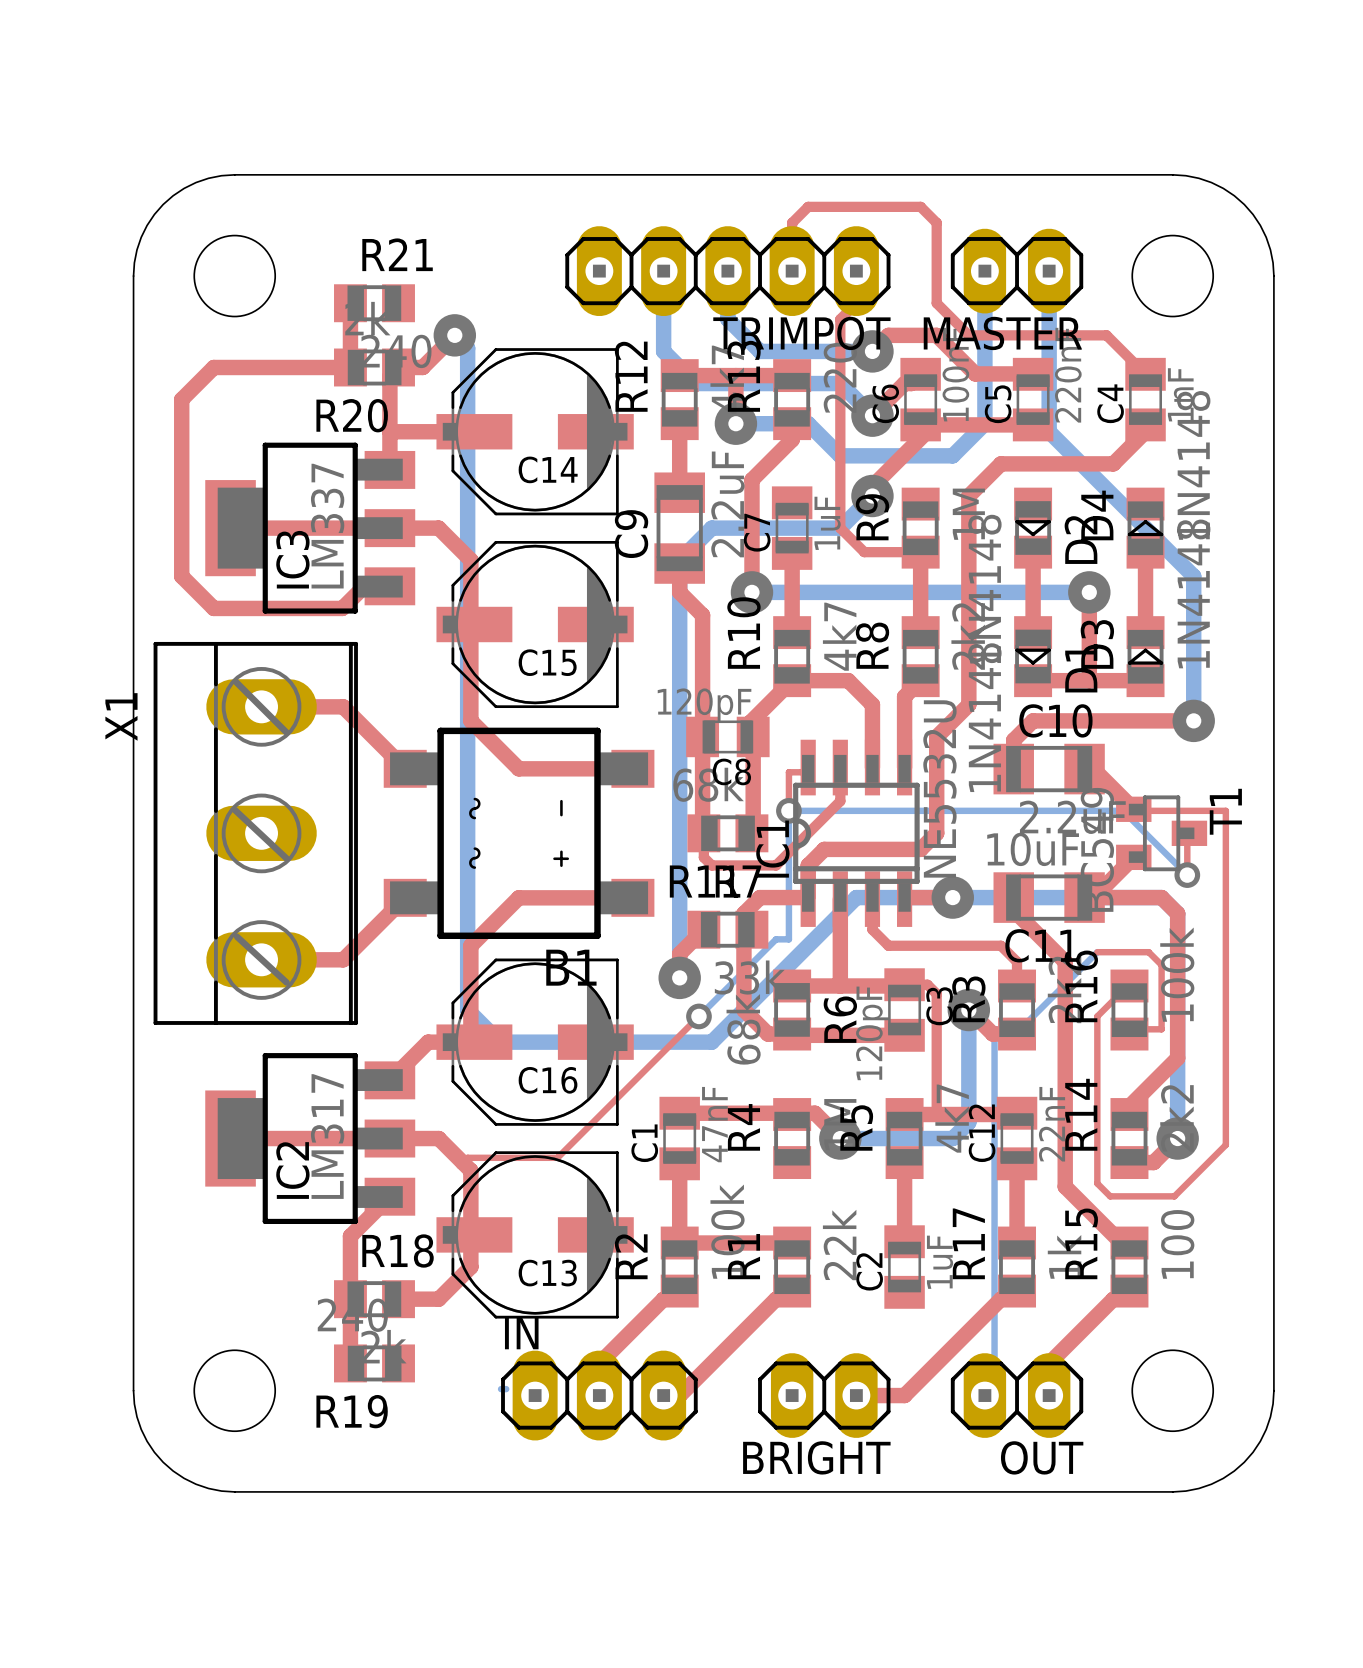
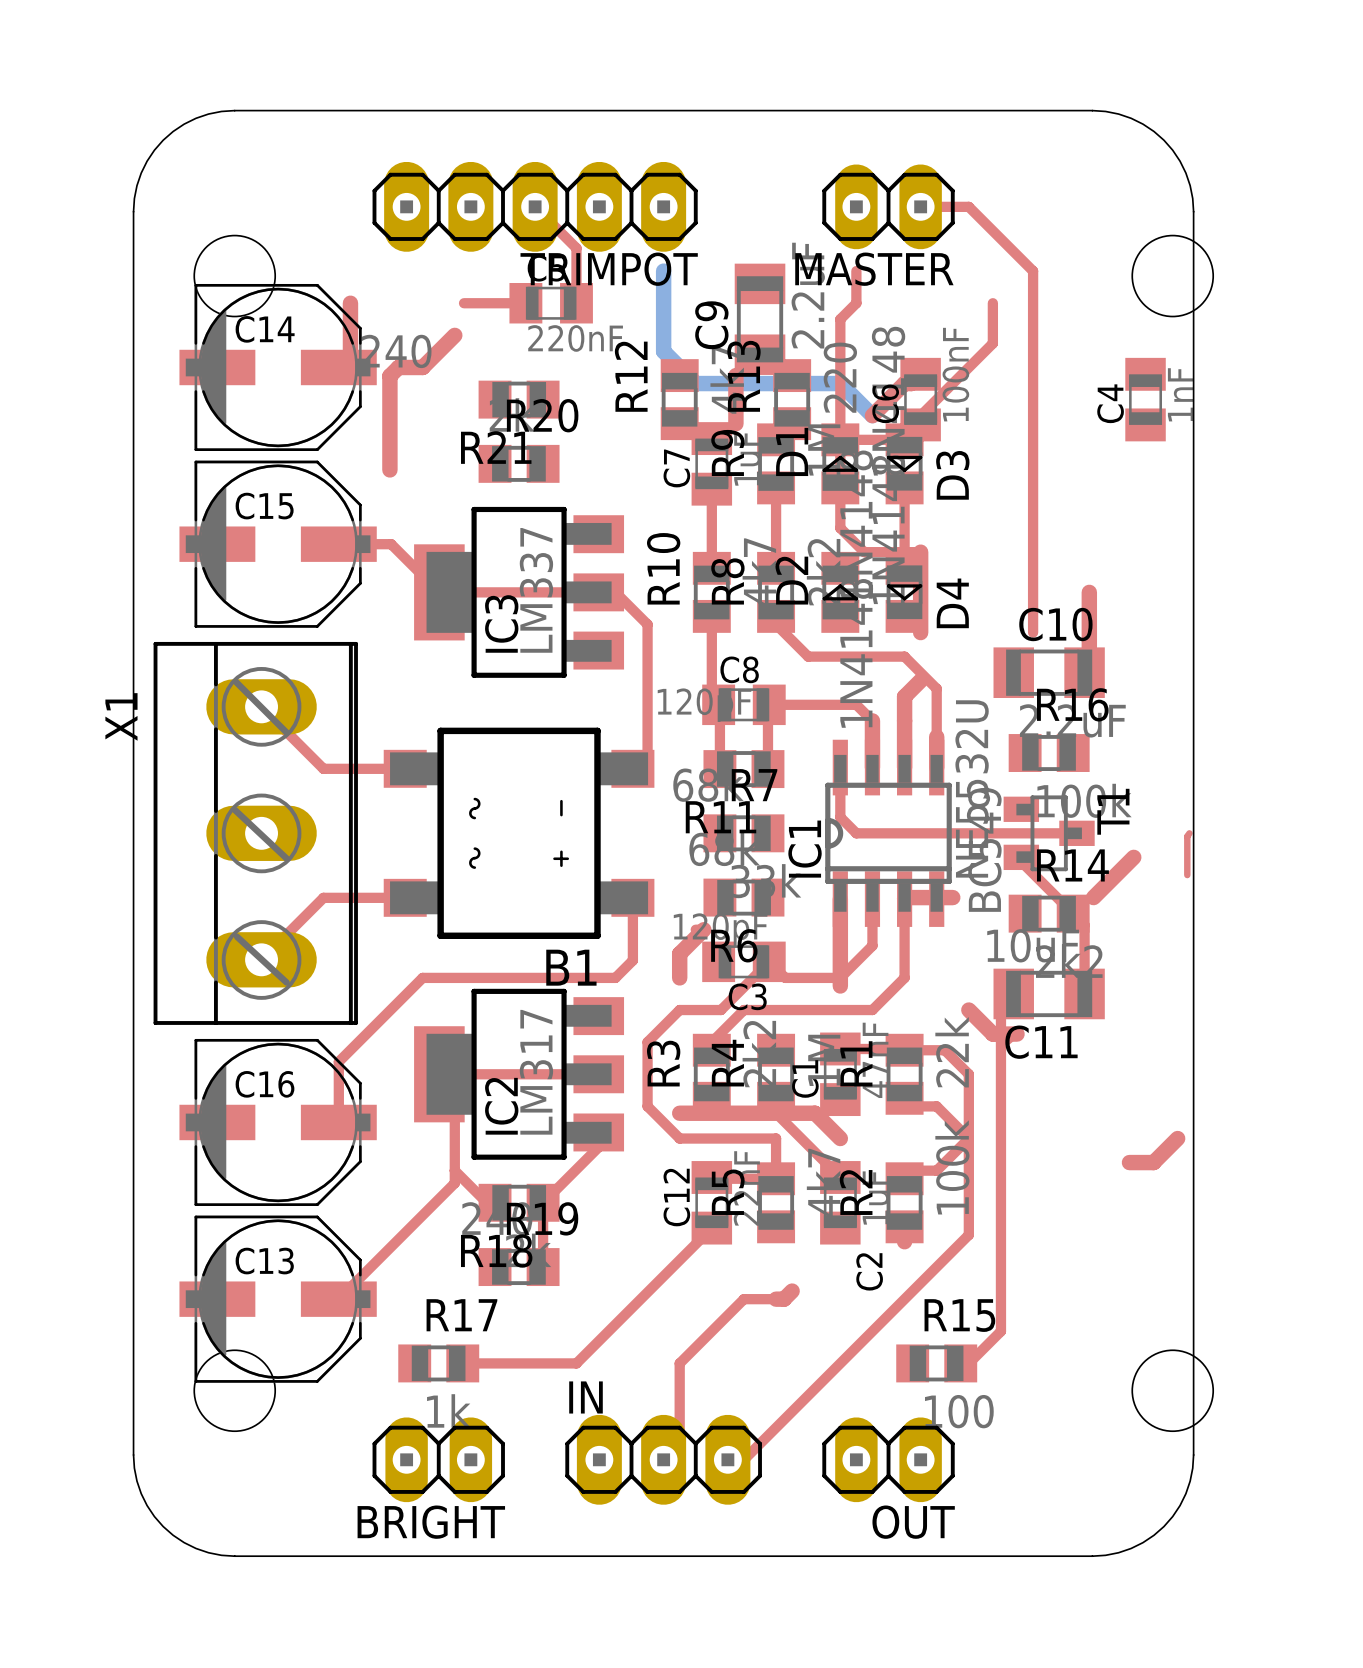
top track: none -> (535, 206) (576, 248) (576, 303)
top track: none -> (920, 206) (968, 206) (1033, 271) (1033, 552)
R21 name position: R21 (397, 254) -> R21 (496, 447)
bottom track: (727, 271) (727, 319) (760, 351) (872, 351) -> none
TRIMPOT position: (727, 271) -> (535, 206)
top track: (792, 271) (792, 222) (808, 206) (920, 206) (936, 222) (936, 303) (968, 335) (1106, 335) (1145, 374) -> none
bottom track: (984, 271) (984, 423) (952, 455) (840, 455) (808, 423) (735, 423) -> none
MASTER position: (1017, 271) -> (888, 206)
bottom track: (1049, 271) (1049, 431) (1193, 576) (1193, 720) -> none
board edge: (133, 276) (134, 262) (141, 237) (147, 225) (163, 204) (184, 188) (196, 182) (221, 175) (234, 174) (1185, 175) (1198, 178) (1223, 188) (1244, 204) (1260, 225) (1266, 237) (1273, 262) (1273, 276) (1273, 1390) (1273, 1403) (1266, 1429) (1260, 1441) (1244, 1462) (1223, 1478) (1211, 1484) (1185, 1491) (1172, 1491) (234, 1491) (221, 1491) (196, 1484) (184, 1478) (163, 1462) (147, 1441) (141, 1429) (134, 1403) (133, 1390) -> (133, 276) (134, 198) (136, 185) (147, 161) (163, 140) (184, 124) (208, 114) (221, 111) (1105, 111) (1118, 114) (1143, 124) (1163, 140) (1180, 161) (1190, 185) (1192, 198) (1193, 1455) (1192, 1468) (1185, 1493) (1180, 1505) (1163, 1526) (1143, 1542) (1131, 1548) (1105, 1555) (1092, 1556) (221, 1555) (208, 1552) (184, 1542) (163, 1526) (147, 1505) (136, 1481) (134, 1468) (133, 1390)
R21 position: (374, 303) -> (519, 399)
top track: none -> (464, 303) (525, 303)
top track: none -> (992, 303) (992, 343) (904, 431) (904, 439) (840, 439)
bottom track: (454, 335) (467, 348) (467, 1010) (499, 1042) (711, 1042) (856, 897) (1161, 897) (1177, 913) (1177, 1138) -> none
via: (454, 335) -> none
top track: (872, 351) (888, 335) (936, 335) (975, 373) (1033, 373) -> none
via: (872, 351) -> none
top track: (338, 367) (213, 367) (181, 399) (181, 576) (213, 608) (342, 608) (364, 586) (389, 586) -> none
R20 position: (374, 367) -> (519, 463)
top track: (679, 375) (792, 375) -> none
C5 rotation: 0° (1033, 399) -> 90° clockwise (551, 303)
C5 position: (1033, 399) -> (551, 303)
R20 name position: R20 (352, 415) -> R20 (542, 415)
via: (872, 415) -> none
top track: (679, 423) (679, 492) -> none
via: (735, 423) -> none
top track: (792, 423) (792, 439) (751, 479) (751, 592) -> none
top track: (1033, 424) (920, 424) (933, 425) (872, 486) (872, 495) -> none
top track: (1145, 424) (1145, 431) (1113, 463) (1000, 463) (968, 495) (968, 704) (936, 736) -> (776, 616) (776, 624) (808, 656) (904, 656) (936, 688) (936, 736)
top track: (389, 431) (454, 431) (461, 438) (467, 438) (474, 431) -> none
C14 rotation: 0° (535, 431) -> 180° (278, 367)
C14 position: (535, 431) -> (278, 367)
top track: none -> (776, 487) (776, 568)
bottom track: (872, 495) (840, 528) (711, 528) (679, 560) (679, 977) -> none
via: (872, 495) -> none
top track: (230, 528) (438, 528) (470, 560) (470, 620) (474, 624) (470, 628) (470, 720) (518, 768) (632, 768) -> (338, 544) (391, 544) (439, 592) (615, 592) (647, 624) (647, 754) (632, 768)
IC3 position: (310, 528) -> (519, 592)
C9 position: (679, 528) -> (760, 319)
C7 position: (792, 528) -> (711, 463)
R9 position: (920, 528) -> (776, 463)
D2 rotation: 0° (1033, 528) -> 180° (840, 592)
D2 position: (1033, 528) -> (840, 592)
D4 rotation: 0° (1145, 528) -> 180° (904, 592)
D4 position: (1145, 528) -> (904, 592)
top track width: thick (1033, 552) (1033, 632) -> thin (1033, 552) (1033, 632)
top track: (1145, 552) (1145, 632) -> (904, 487) (904, 568)
top track: (792, 553) (792, 632) -> (711, 489) (711, 568)
top track: (679, 563) (679, 592) (702, 615) (702, 832) -> none
bottom track: (751, 592) (1089, 592) -> none
via: (751, 592) -> none
via: (1089, 592) -> none
top track: none -> (711, 616) (711, 697) (719, 706) (719, 769)
C15 rotation: 0° (535, 624) -> 180° (278, 544)
C15 position: (535, 624) -> (278, 544)
R10 position: (792, 656) -> (711, 592)
R8 position: (920, 656) -> (776, 592)
D1 rotation: 0° (1033, 656) -> 180° (840, 463)
D1 position: (1033, 656) -> (840, 463)
D3 rotation: 0° (1145, 656) -> 180° (904, 463)
D3 position: (1145, 656) -> (904, 463)
top track: (792, 680) (848, 680) (872, 704) (872, 720) -> (767, 769) (769, 704) (856, 704) (872, 720)
top track: (792, 680) (750, 722) (750, 734) (753, 736) (751, 833) -> none
top track: (1033, 680) (1145, 680) (1135, 682) -> none
top track: (261, 706) (343, 706) (405, 768) -> (261, 706) (323, 768) (405, 768)
top track: (1193, 720) (1033, 720) (1013, 740) (1013, 769) -> none
via: (1193, 720) -> none
C8 position: (727, 736) -> (743, 704)
top track: (808, 767) (801, 772) (788, 772) (788, 810) -> none
top track: (936, 767) (936, 833) (920, 849) (824, 849) (808, 865) (806, 897) -> none
C10 position: (1049, 769) -> (1049, 672)
top track: (1084, 769) (1093, 769) (1135, 810) (1225, 810) (1225, 1144) (1174, 1196) (1110, 1196) (1097, 1183) (1097, 1016) (1129, 985) -> none
C8 name position: C8 (731, 771) -> C8 (739, 669)
top track: (840, 801) (776, 865) (711, 865) (703, 857) (703, 833) (698, 823) (702, 823) -> (840, 801) (840, 817) (856, 833) (1076, 833)
via: (788, 810) -> none
R11 position: (727, 833) -> (743, 769)
IC1 position: (856, 833) -> (888, 833)
T1 position: (1161, 833) -> (1049, 833)
top track: none -> (1021, 857) (1021, 861) (1084, 925) (1084, 993)
bottom track: (1187, 875) (1123, 810) (788, 810) (788, 939) (776, 939) (698, 1016) -> none
via: (1187, 875) -> none
top track: (405, 897) (343, 959) (261, 959) -> (405, 897) (323, 897) (261, 959)
top track: (632, 897) (518, 897) (470, 945) (470, 1038) (474, 1042) (428, 1042) (389, 1080) -> (632, 897) (632, 960) (615, 977) (422, 977) (338, 1061) (338, 1122)
top track: (806, 897) (760, 897) (743, 913) (743, 929) (751, 929) (743, 937) (743, 1010) (767, 1034) (904, 1035) -> none
via: (952, 897) -> none
top track: (1013, 897) (1017, 900) (1017, 913) (1065, 961) (1065, 1186) (1129, 1250) (1129, 1243) -> none
C11 position: (1049, 897) -> (1049, 993)
top track: (1084, 897) (1161, 897) (1177, 913) (1177, 1058) (1129, 1106) (1129, 1114) -> none
top track: none -> (904, 900) (904, 977) (872, 1010) (743, 1010) (711, 1042) (711, 1050)
R7 position: (727, 929) -> (743, 833)
top track: (872, 929) (888, 945) (1000, 945) (1017, 961) (1017, 985) -> (872, 929) (872, 945) (840, 977) (785, 977) (769, 961) (721, 1010) (679, 1010) (647, 1042) (647, 1106) (679, 1138) (776, 1138) (776, 1178) (711, 1177)
top track: (1097, 952) (1148, 952) (1161, 965) (1161, 1029) (1135, 1029) (1129, 1034) -> none
bottom track: (1097, 952) (1020, 1029) (994, 1029) (994, 1389) (984, 1395) -> none
via: (679, 977) -> none
top track: (792, 985) (903, 985) (904, 990) (904, 984) (927, 984) (936, 993) (936, 1114) -> none
top track: none -> (1013, 993) (1000, 1006) (1000, 1331) (968, 1363) (960, 1363)
R6 rotation: 0° (792, 1010) -> 90° clockwise (743, 897)
R6 position: (792, 1010) -> (743, 897)
C3 rotation: 0° (904, 1010) -> 90° clockwise (743, 961)
C3 position: (904, 1010) -> (743, 961)
bottom track: (968, 1010) (968, 1122) (952, 1138) (840, 1138) -> none
via: (968, 1010) -> none
R3 position: (1017, 1010) -> (711, 1074)
R16 rotation: 0° (1129, 1010) -> 90° clockwise (1049, 753)
R16 position: (1129, 1010) -> (1049, 753)
top track: (698, 1016) (557, 1157) (467, 1157) (462, 1162) -> none
via: (698, 1016) -> none
C16 rotation: 0° (535, 1042) -> 180° (278, 1122)
C16 position: (535, 1042) -> (278, 1122)
top track: none -> (840, 1048) (944, 1050) (968, 1074) (968, 1234) (743, 1459) (727, 1459)
top track: none -> (439, 1074) (598, 1074)
top track: none -> (454, 1074) (454, 1183) (338, 1299)
top track: none -> (776, 1098) (776, 1113) (840, 1177)
top track: none -> (904, 1098) (912, 1106) (936, 1106) (968, 1138) (936, 1170) (912, 1170) (904, 1178)
top track: (904, 1119) (904, 1114) (1017, 1113) (1007, 1119) -> none
top track: none -> (598, 1132) (598, 1147) (543, 1202) (543, 1267)
top track: (230, 1138) (438, 1138) (470, 1170) (470, 1231) (474, 1234) -> none
IC2 position: (310, 1138) -> (519, 1074)
C1 position: (679, 1138) -> (840, 1074)
R4 position: (792, 1138) -> (776, 1074)
via: (840, 1138) -> none
R5 position: (904, 1138) -> (776, 1202)
C12 position: (1017, 1138) -> (711, 1202)
R14 rotation: 0° (1129, 1138) -> 90° clockwise (1049, 913)
R14 position: (1129, 1138) -> (1049, 913)
via: (1177, 1138) -> none
top track: (904, 1162) (904, 1226) -> none
top track: (679, 1163) (679, 1243) (792, 1243) -> none
top track: (1017, 1163) (1017, 1243) -> none
top track: none -> (454, 1170) (486, 1202) (495, 1202)
top track: (389, 1196) (350, 1236) (350, 1363) -> none
top track: none -> (711, 1228) (576, 1363) (462, 1363)
top track: (474, 1234) (470, 1238) (470, 1267) (438, 1299) (398, 1299) -> none
C13 rotation: 0° (535, 1234) -> 180° (278, 1299)
C13 position: (535, 1234) -> (278, 1299)
R18 name position: R18 (398, 1251) -> R18 (496, 1251)
R2 position: (679, 1267) -> (904, 1202)
R1 position: (792, 1267) -> (904, 1074)
C2 position: (904, 1267) -> (840, 1202)
R17 rotation: 0° (1017, 1267) -> 90° clockwise (438, 1363)
R17 position: (1017, 1267) -> (438, 1363)
R15 rotation: 0° (1129, 1267) -> 90° clockwise (936, 1363)
R15 position: (1129, 1267) -> (936, 1363)
top track: (679, 1291) (671, 1299) (663, 1299) (599, 1363) (599, 1395) -> none
top track: (1017, 1291) (1008, 1299) (1000, 1299) (904, 1395) (856, 1395) -> none
top track: (1129, 1291) (1121, 1299) (1113, 1299) (1049, 1363) (1049, 1395) -> none
R18 position: (374, 1299) -> (519, 1202)
top track: (776, 1299) (679, 1395) (663, 1395) -> (776, 1299) (743, 1299) (679, 1363) (679, 1443) (663, 1459)
R19 position: (374, 1363) -> (519, 1267)
bottom track: (501, 1389) (506, 1389) -> none
IN position: (599, 1395) -> (663, 1459)
BRIGHT position: (824, 1395) -> (438, 1459)
OUT position: (1017, 1395) -> (888, 1459)
R19 name position: R19 (352, 1411) -> R19 (542, 1218)

